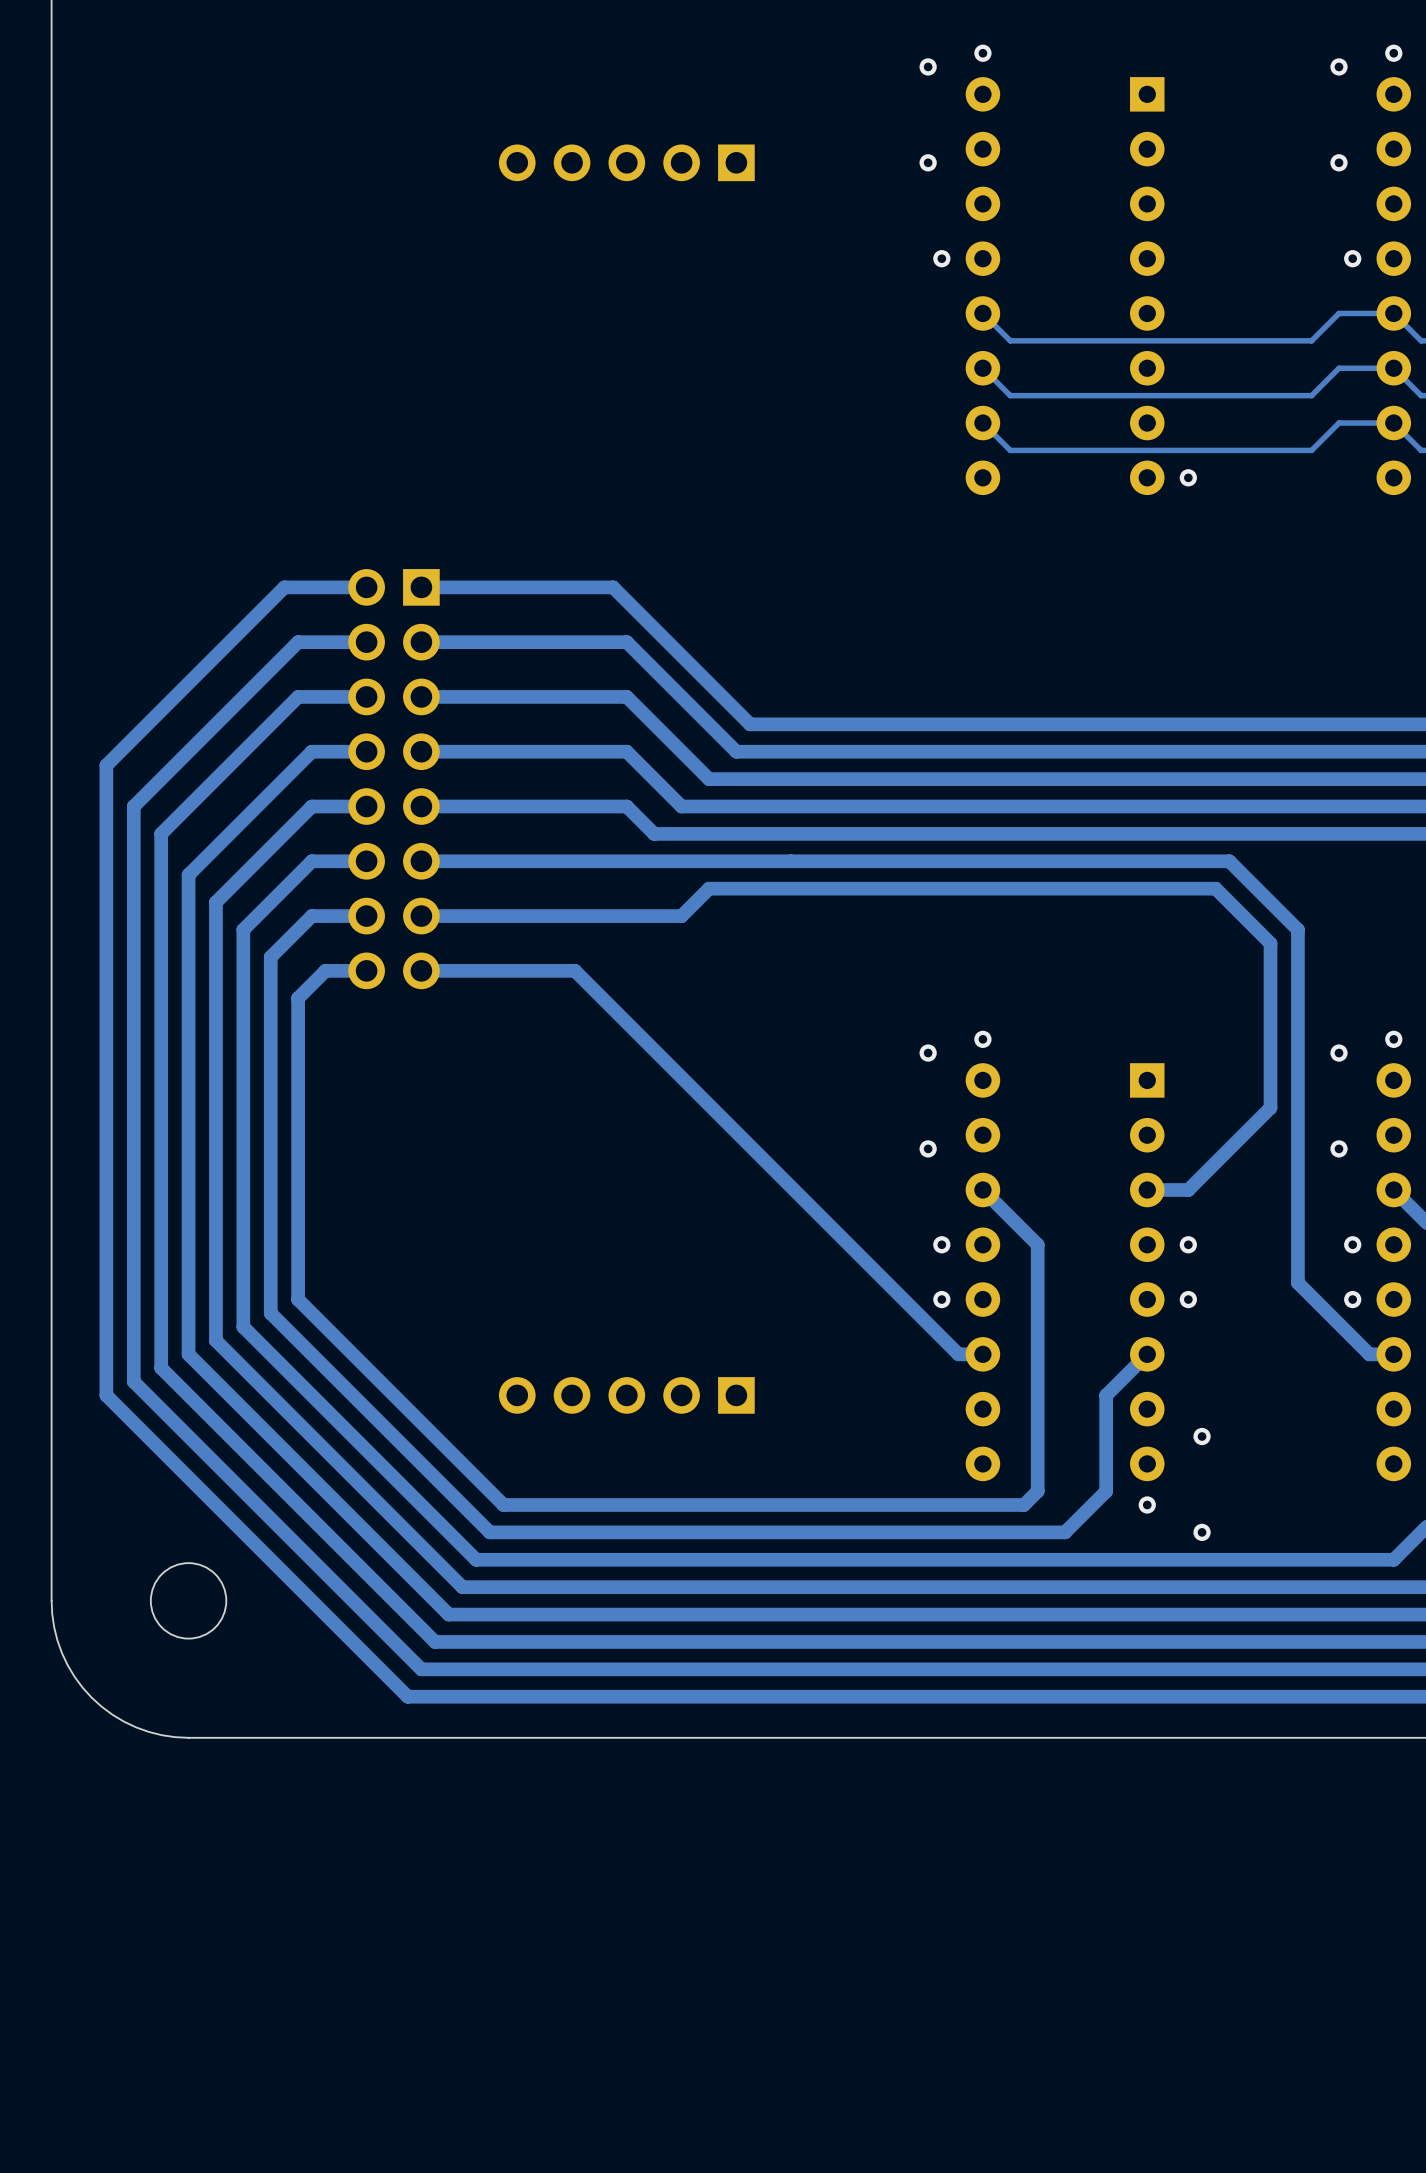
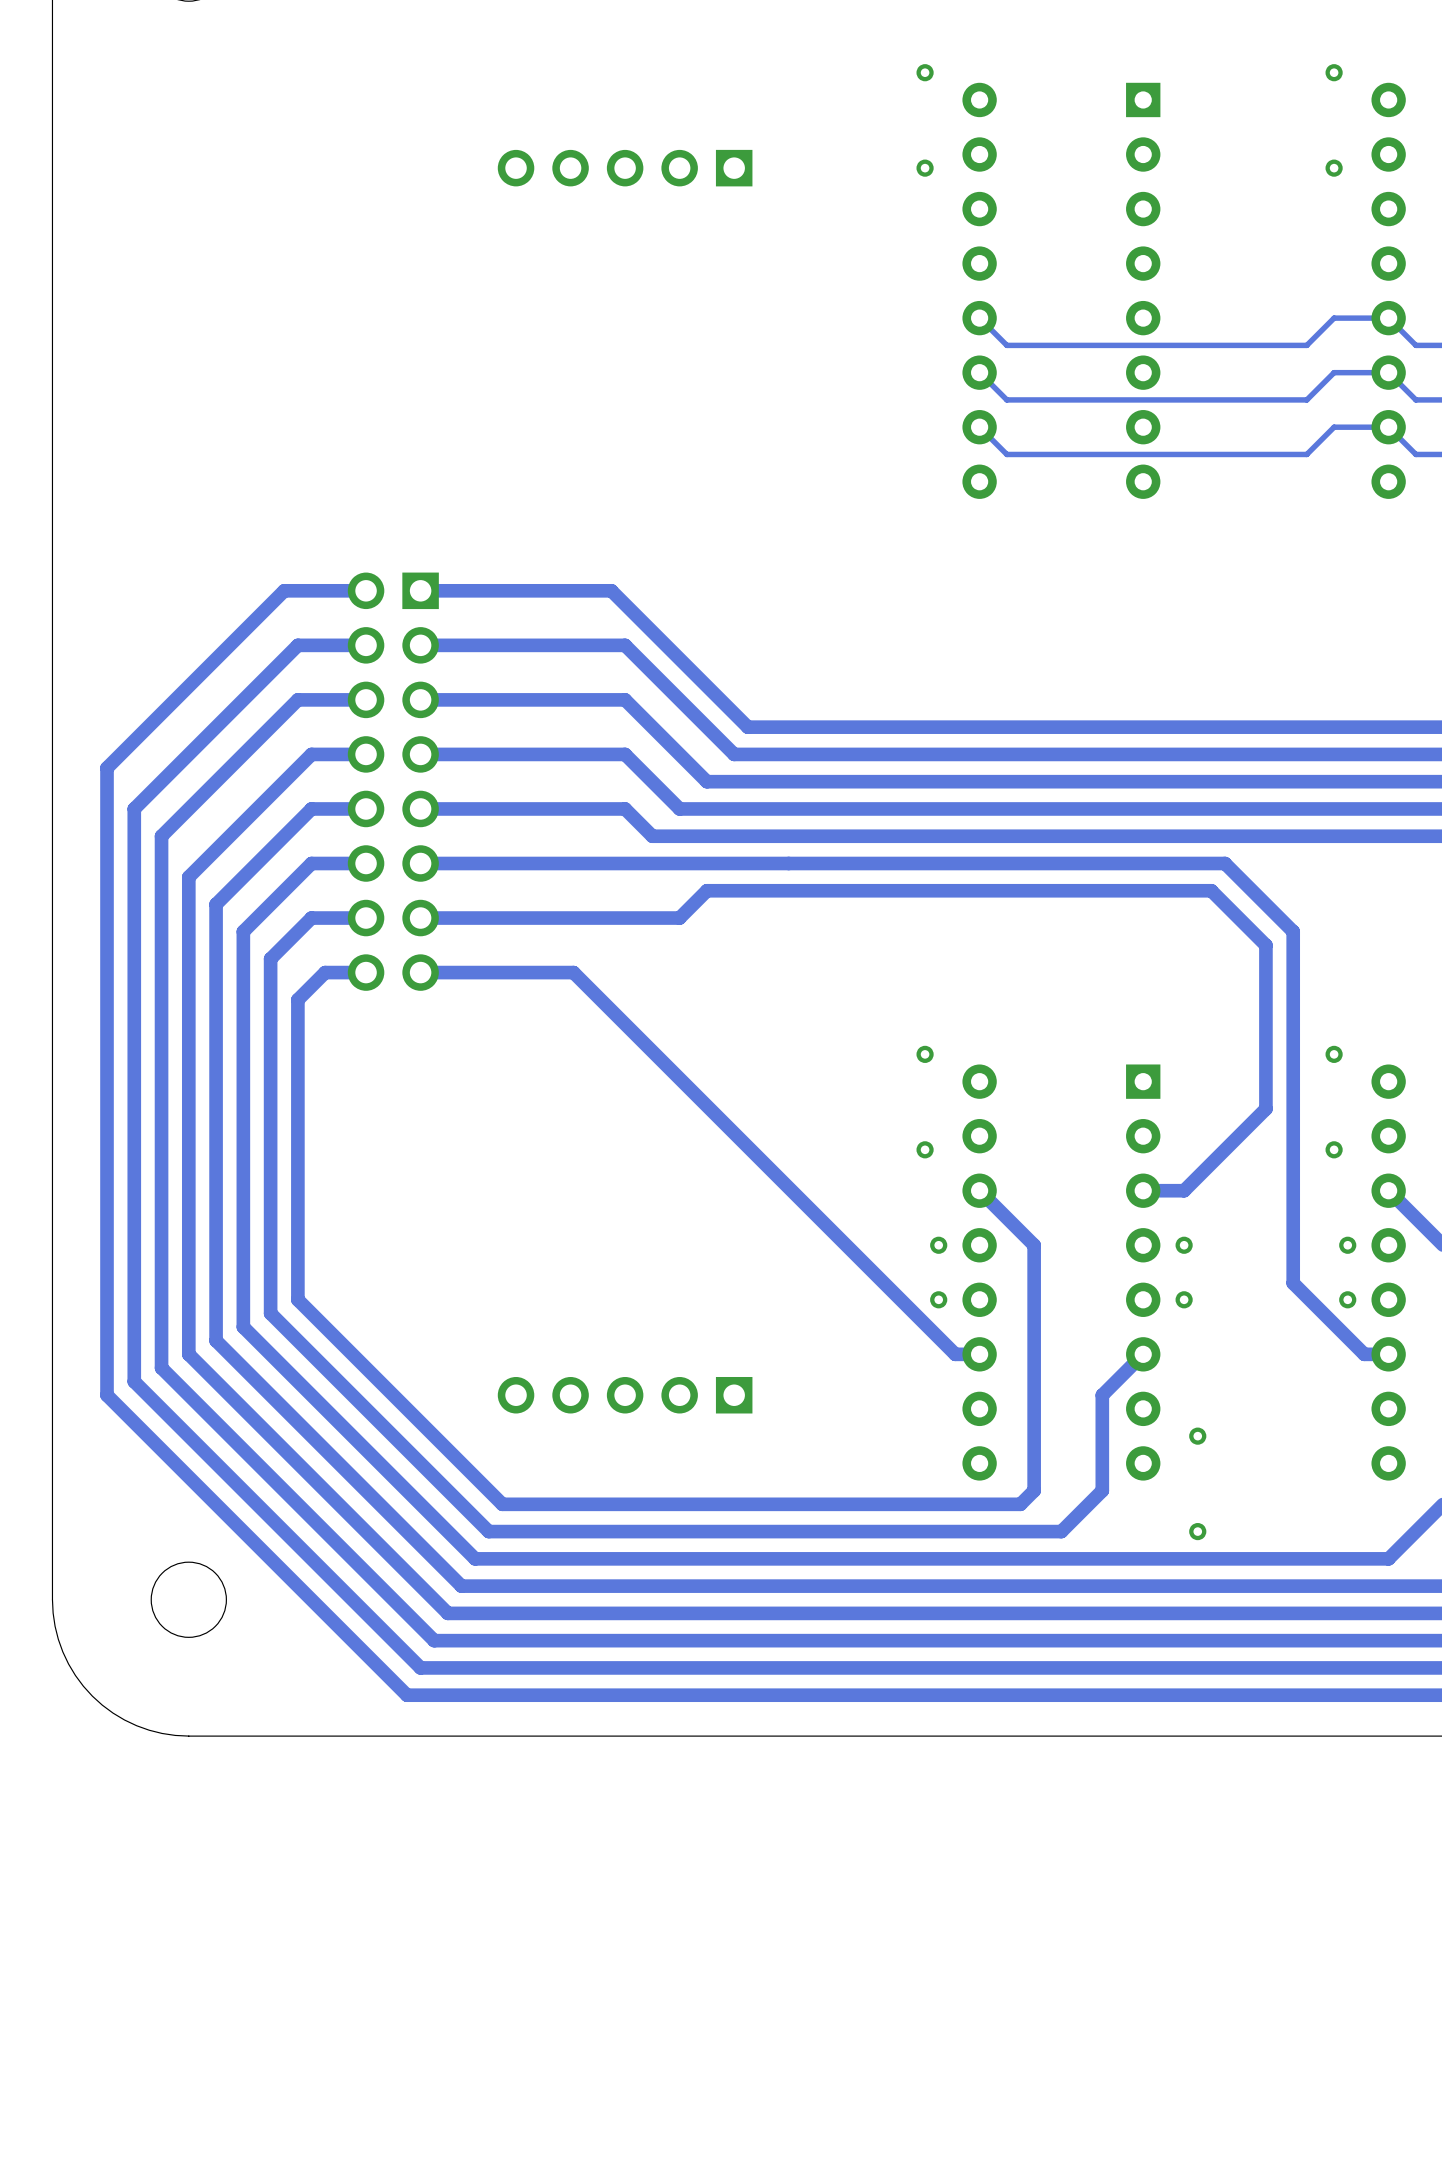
via: (982, 53) -> none
via: (1393, 53) -> none
via: (941, 258) -> none
via: (1352, 258) -> none
via: (1188, 477) -> none
via: (982, 1039) -> none
via: (1393, 1039) -> none
via: (1147, 1504) -> none

